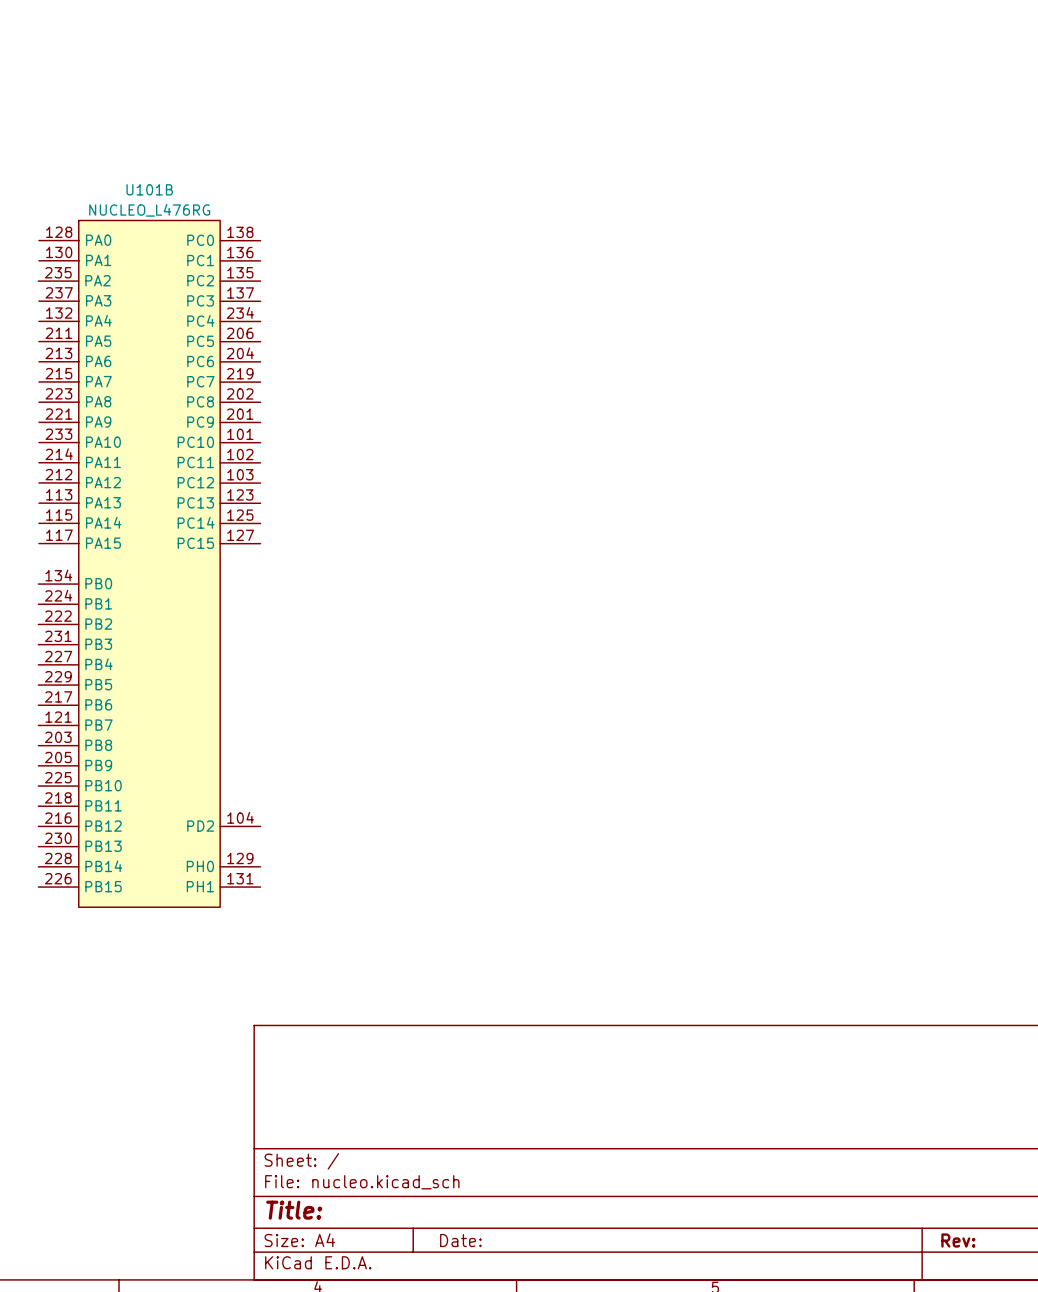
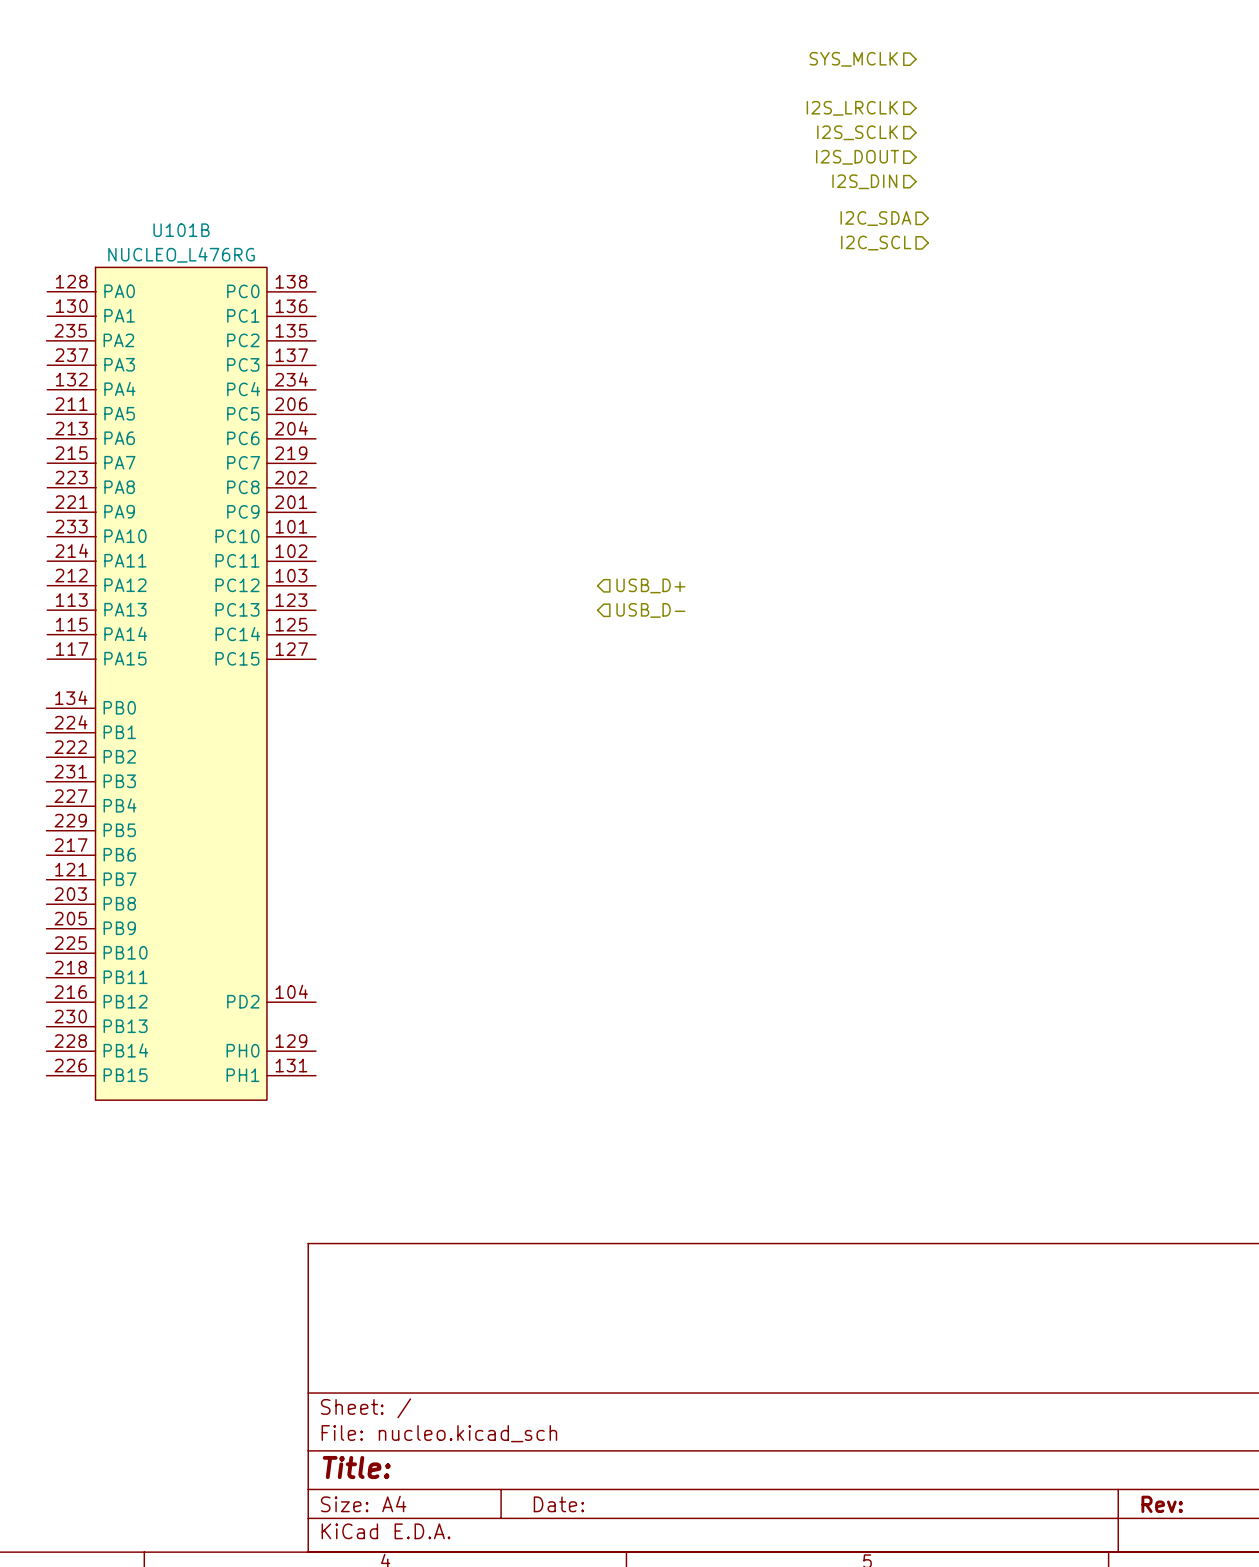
hierarchical label: none -> SYS_MCLK (853, 59)
hierarchical label: none -> I2S_LRCLK (852, 108)
hierarchical label: none -> I2S_SCLK (857, 132)
hierarchical label: none -> I2S_DOUT (857, 157)
hierarchical label: none -> I2S_DIN (864, 181)
hierarchical label: none -> I2C_SDA (875, 218)
hierarchical label: none -> I2C_SCL (876, 243)
hierarchical label: none -> USB_D+ (650, 585)
hierarchical label: none -> USB_D- (650, 610)

